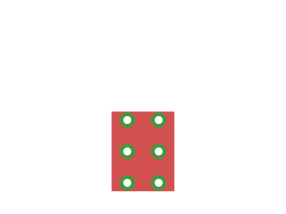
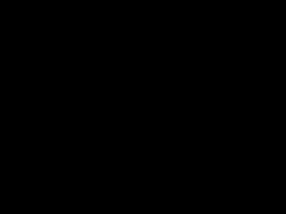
part: (142, 151) -> none

